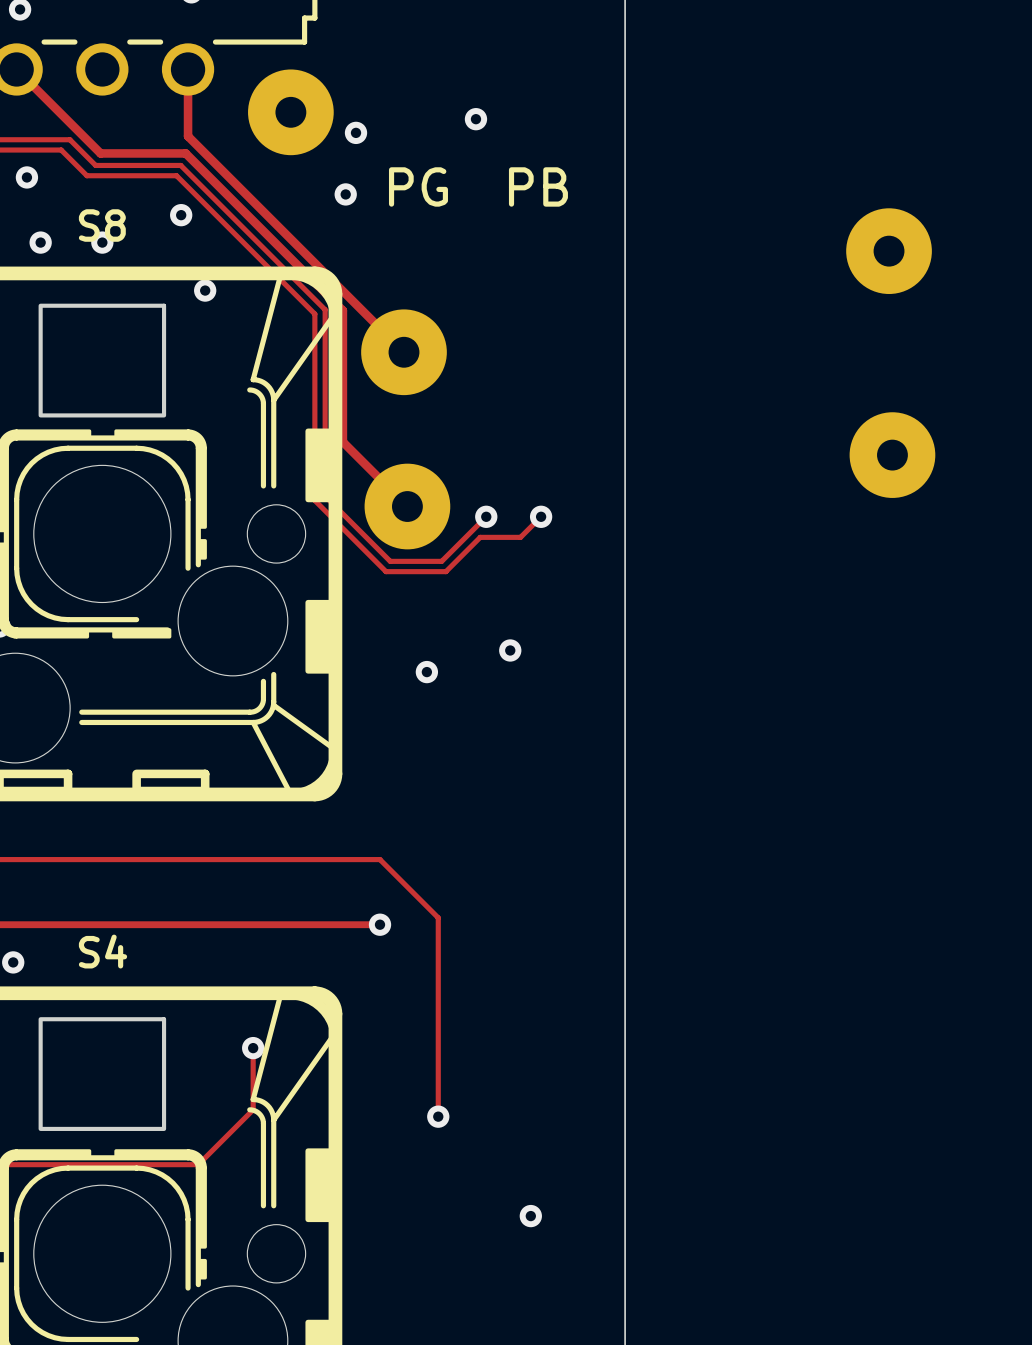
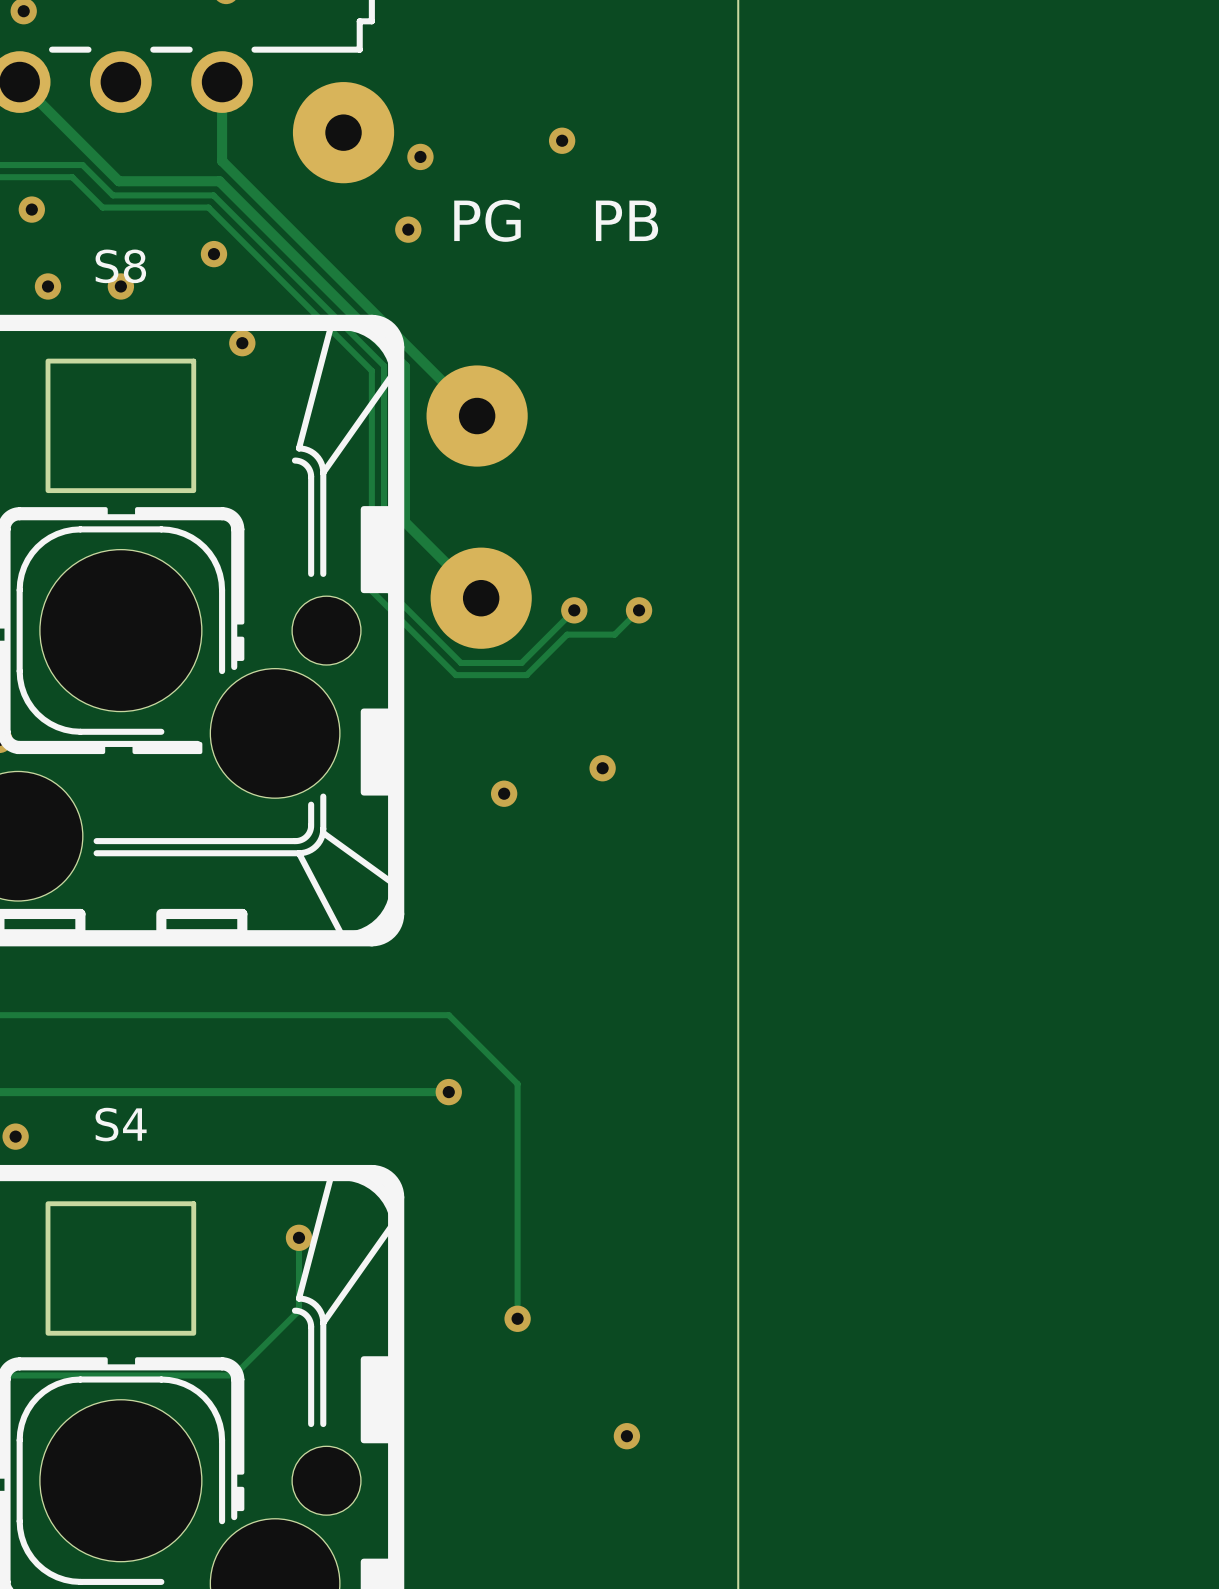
part: (889, 251) -> none
part: (892, 455) -> none

